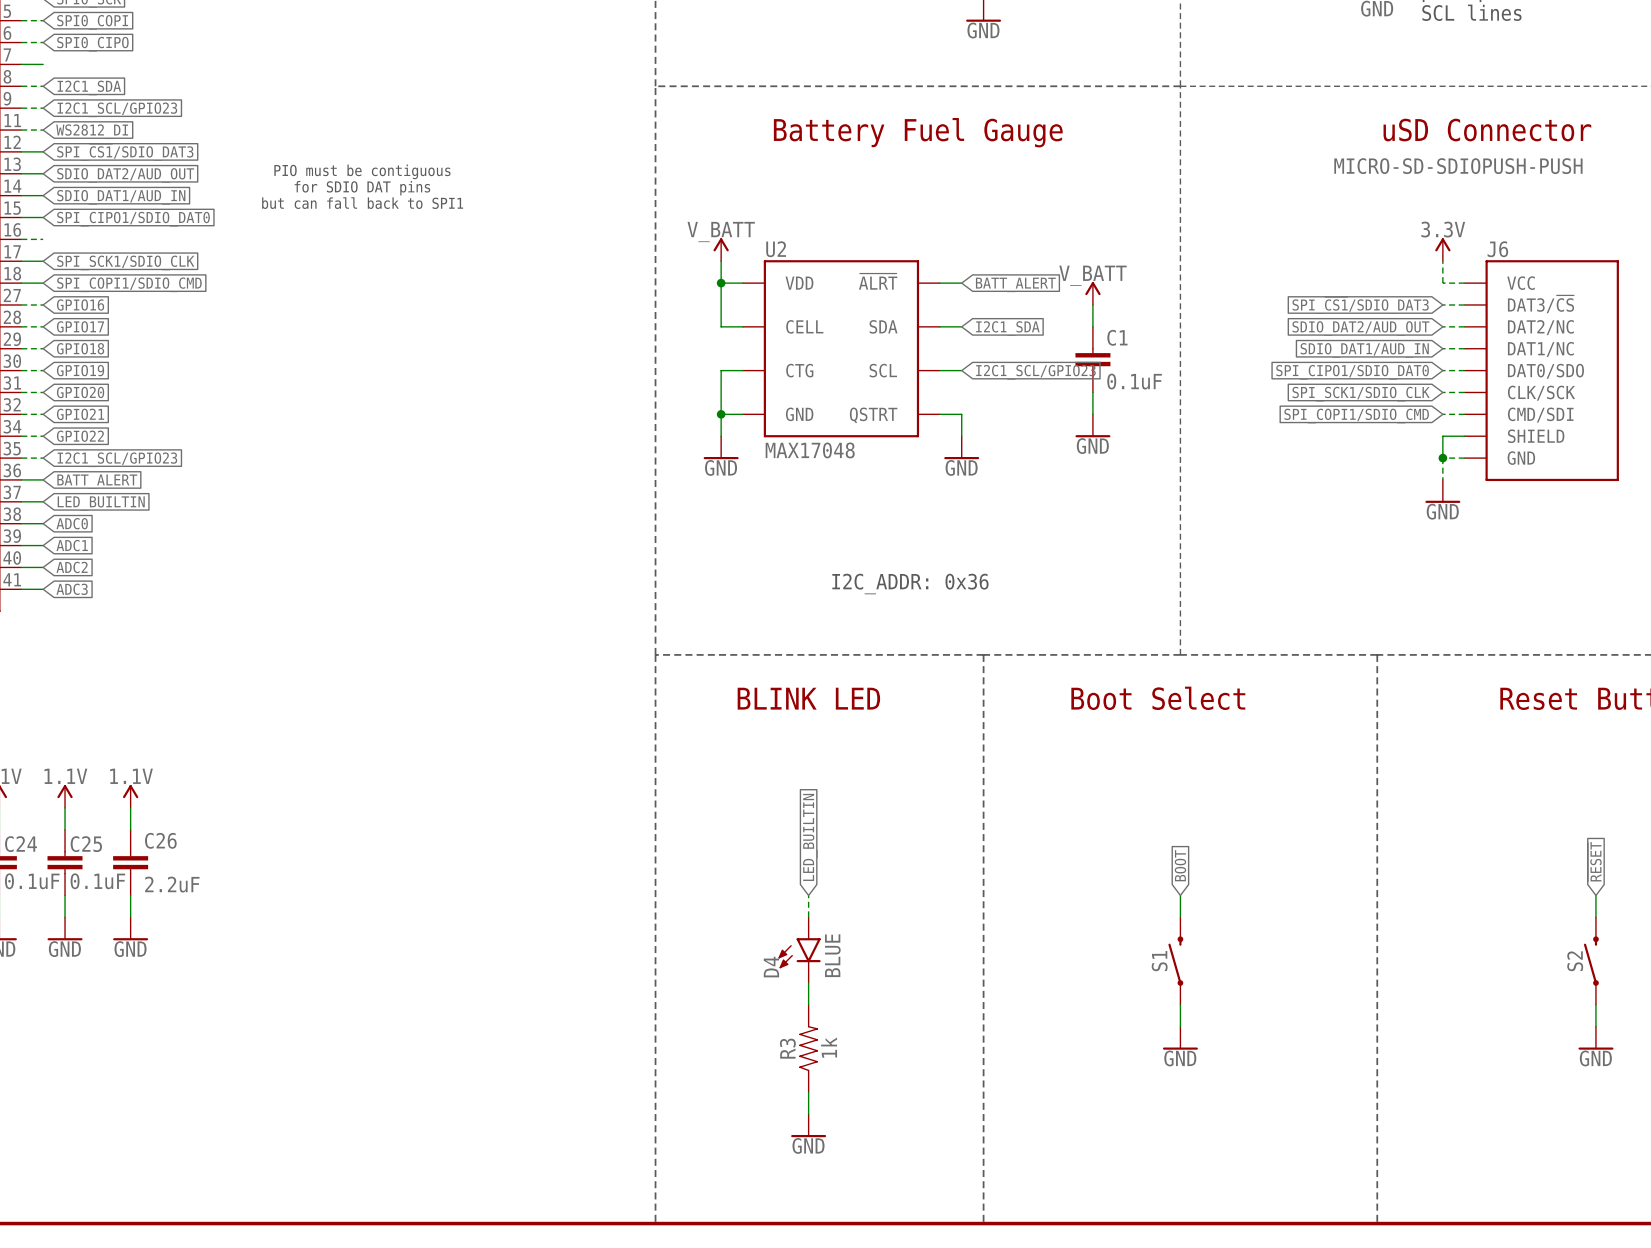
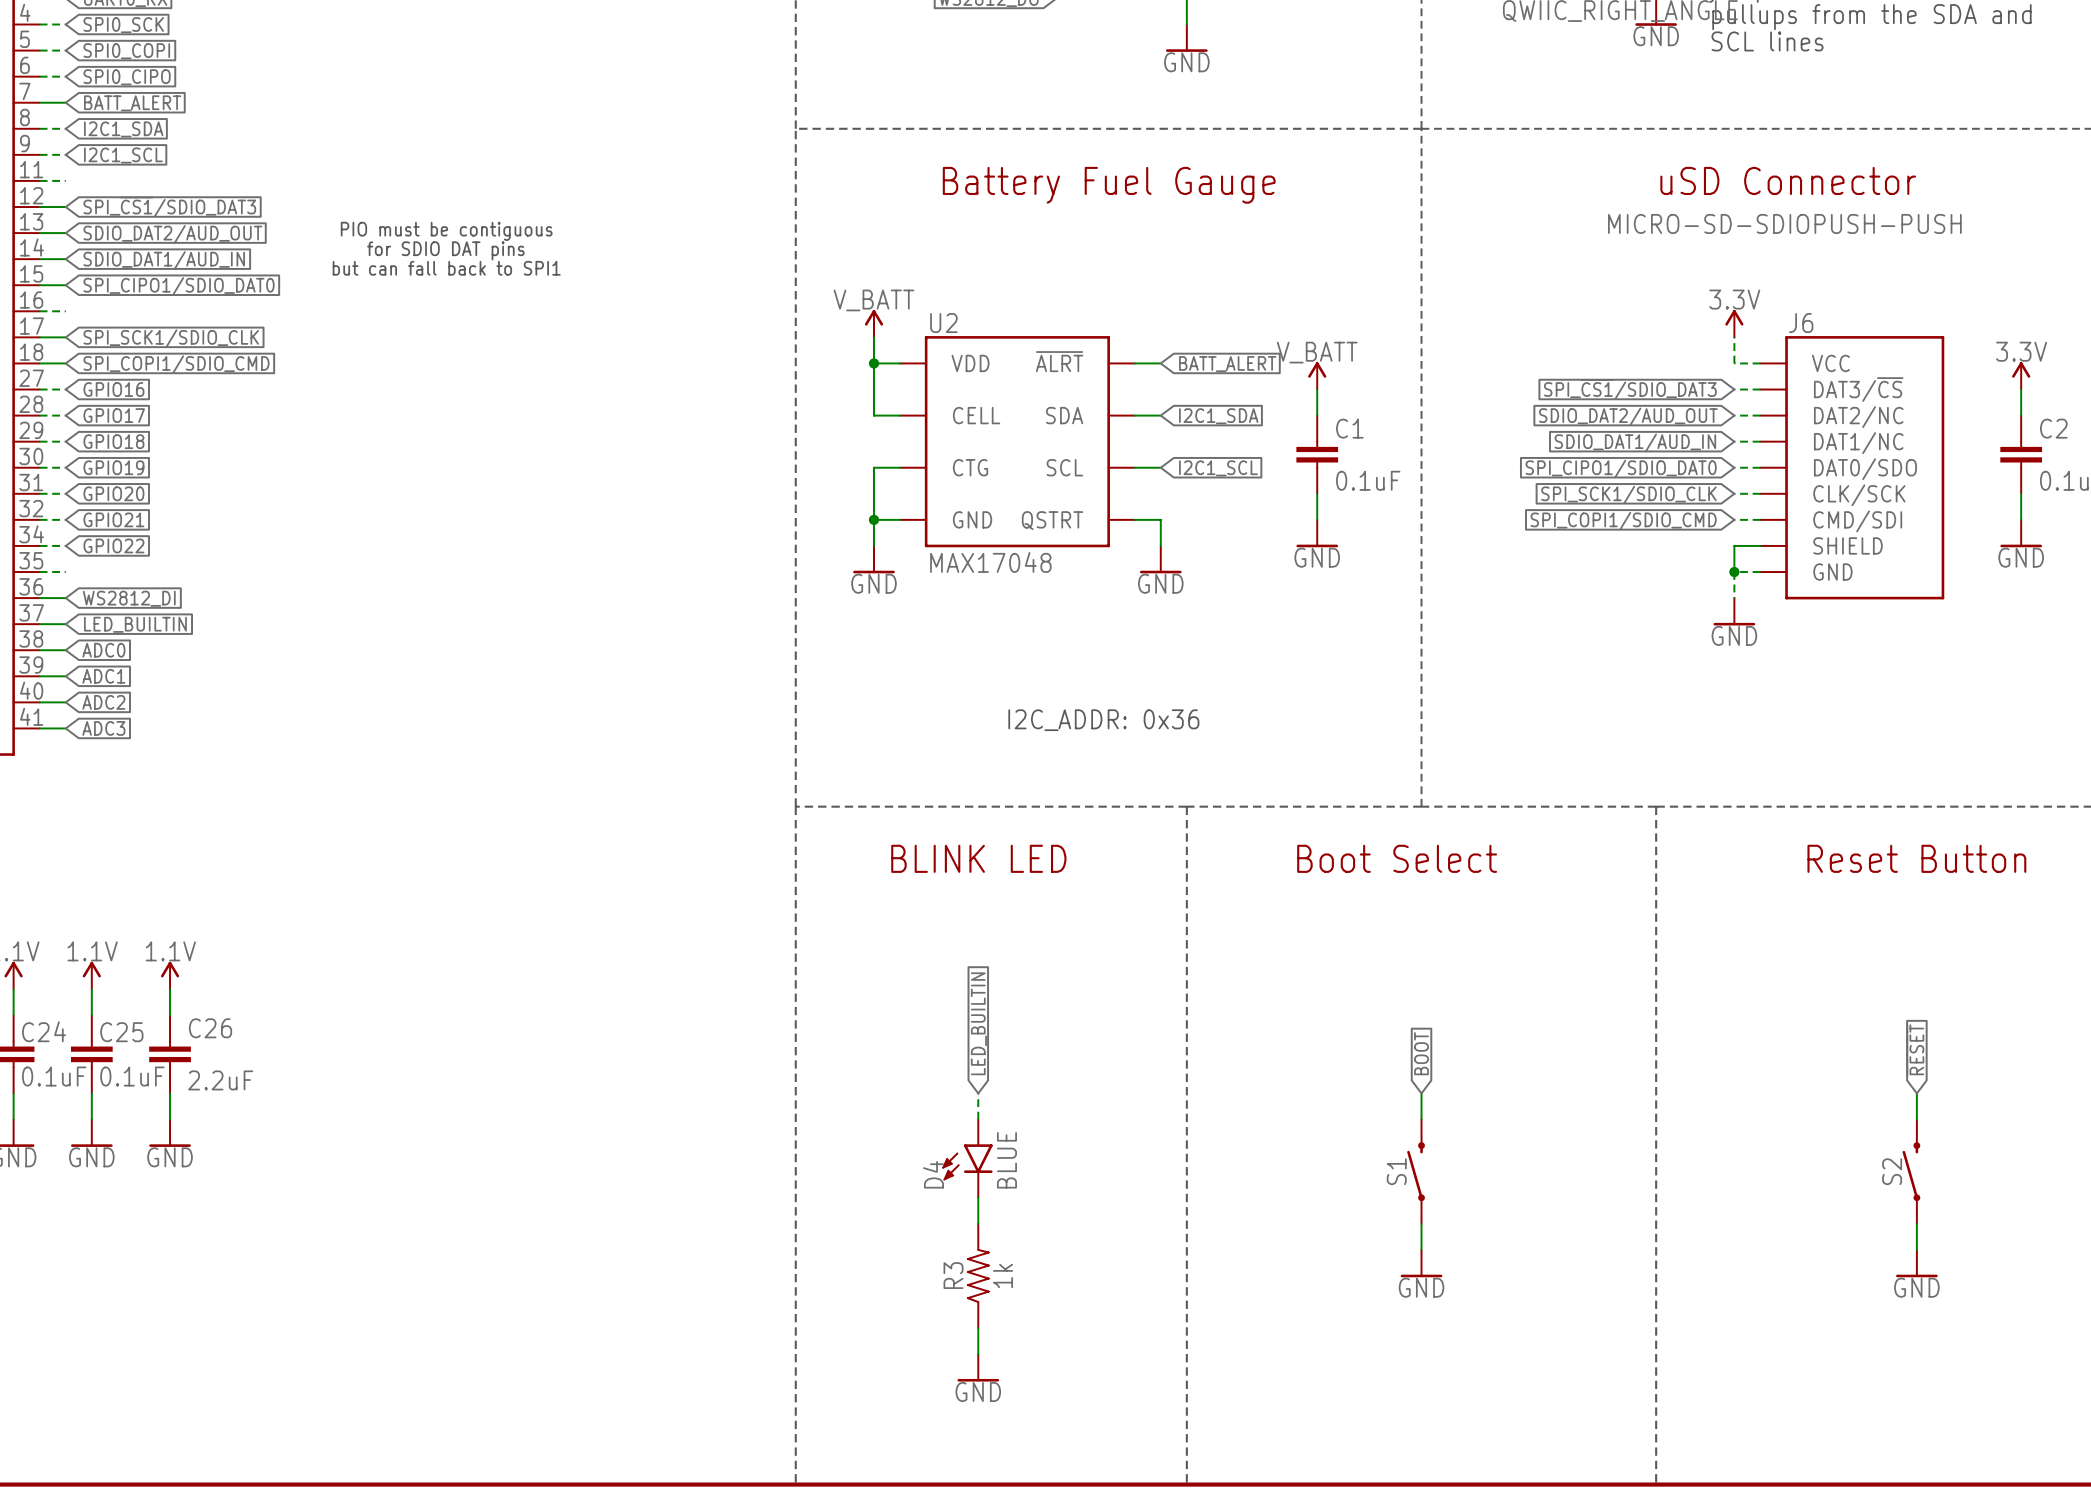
global label: none -> BATT_ALERT (132, 103)
global label: I2C1_SCL/GPIO23 (117, 109) -> I2C1_SCL (123, 155)
global label: WS2812_DI (92, 131) -> none
global label: I2C1_SCL/GPIO23 (1035, 372) -> I2C1_SCL (1218, 468)
global label: I2C1_SCL/GPIO23 (117, 459) -> none
global label: BATT_ALERT (97, 481) -> WS2812_DI (129, 598)

